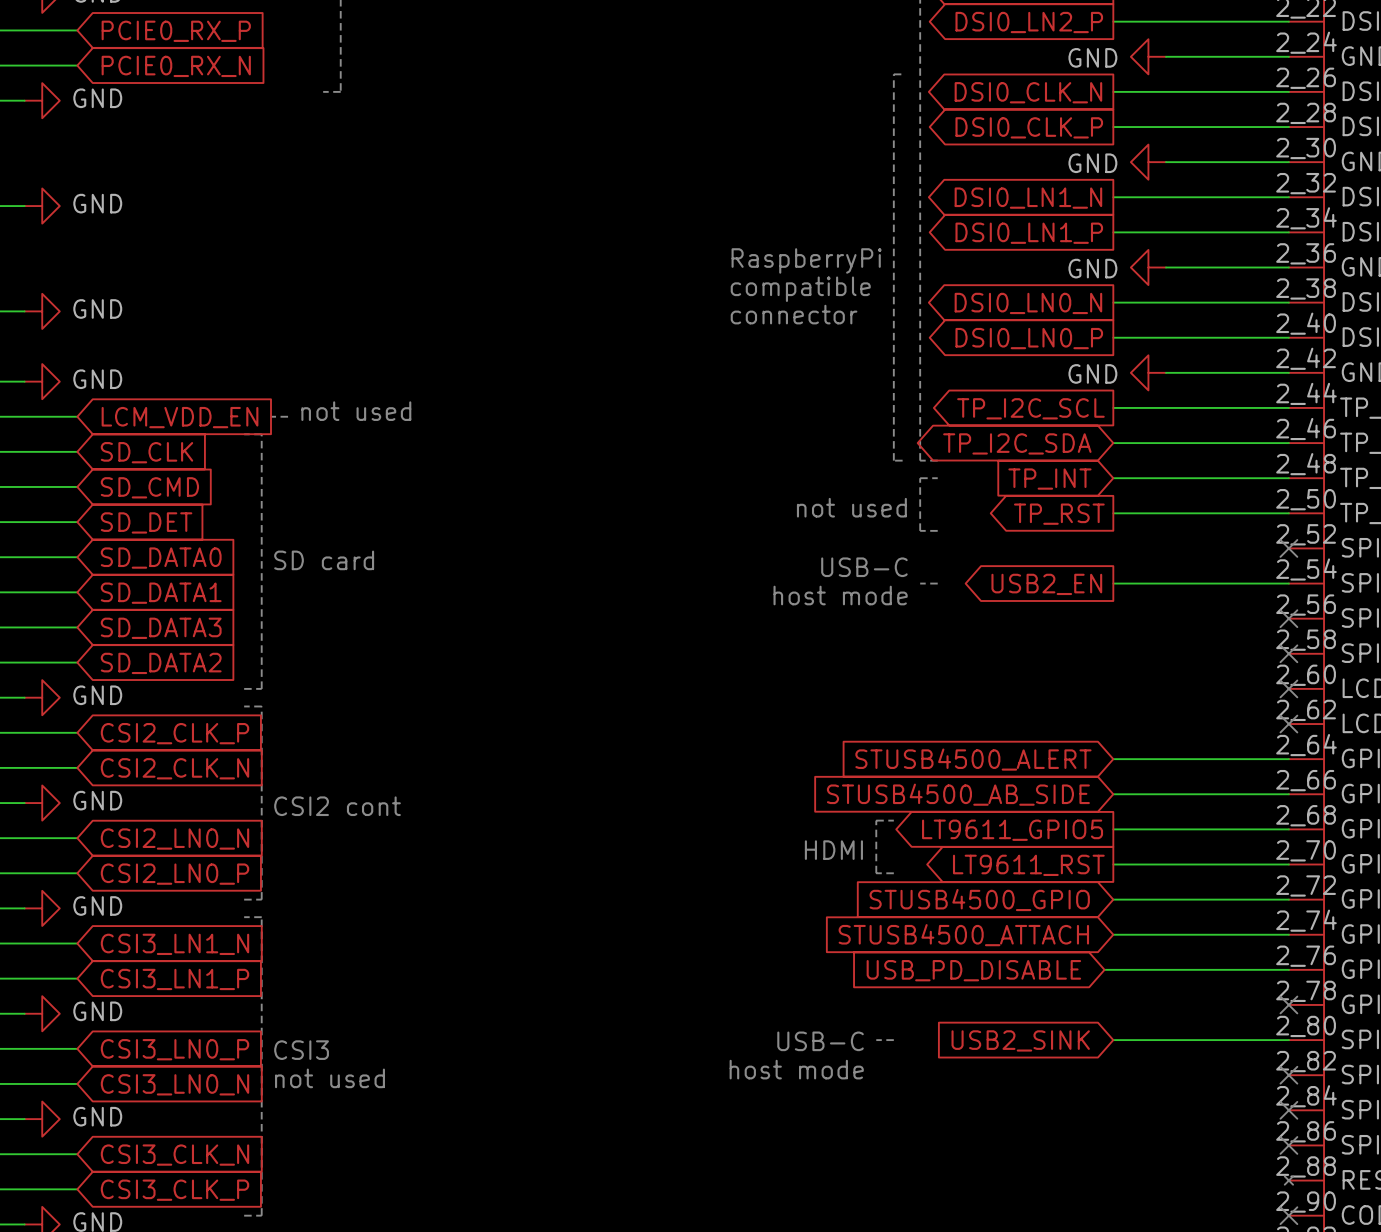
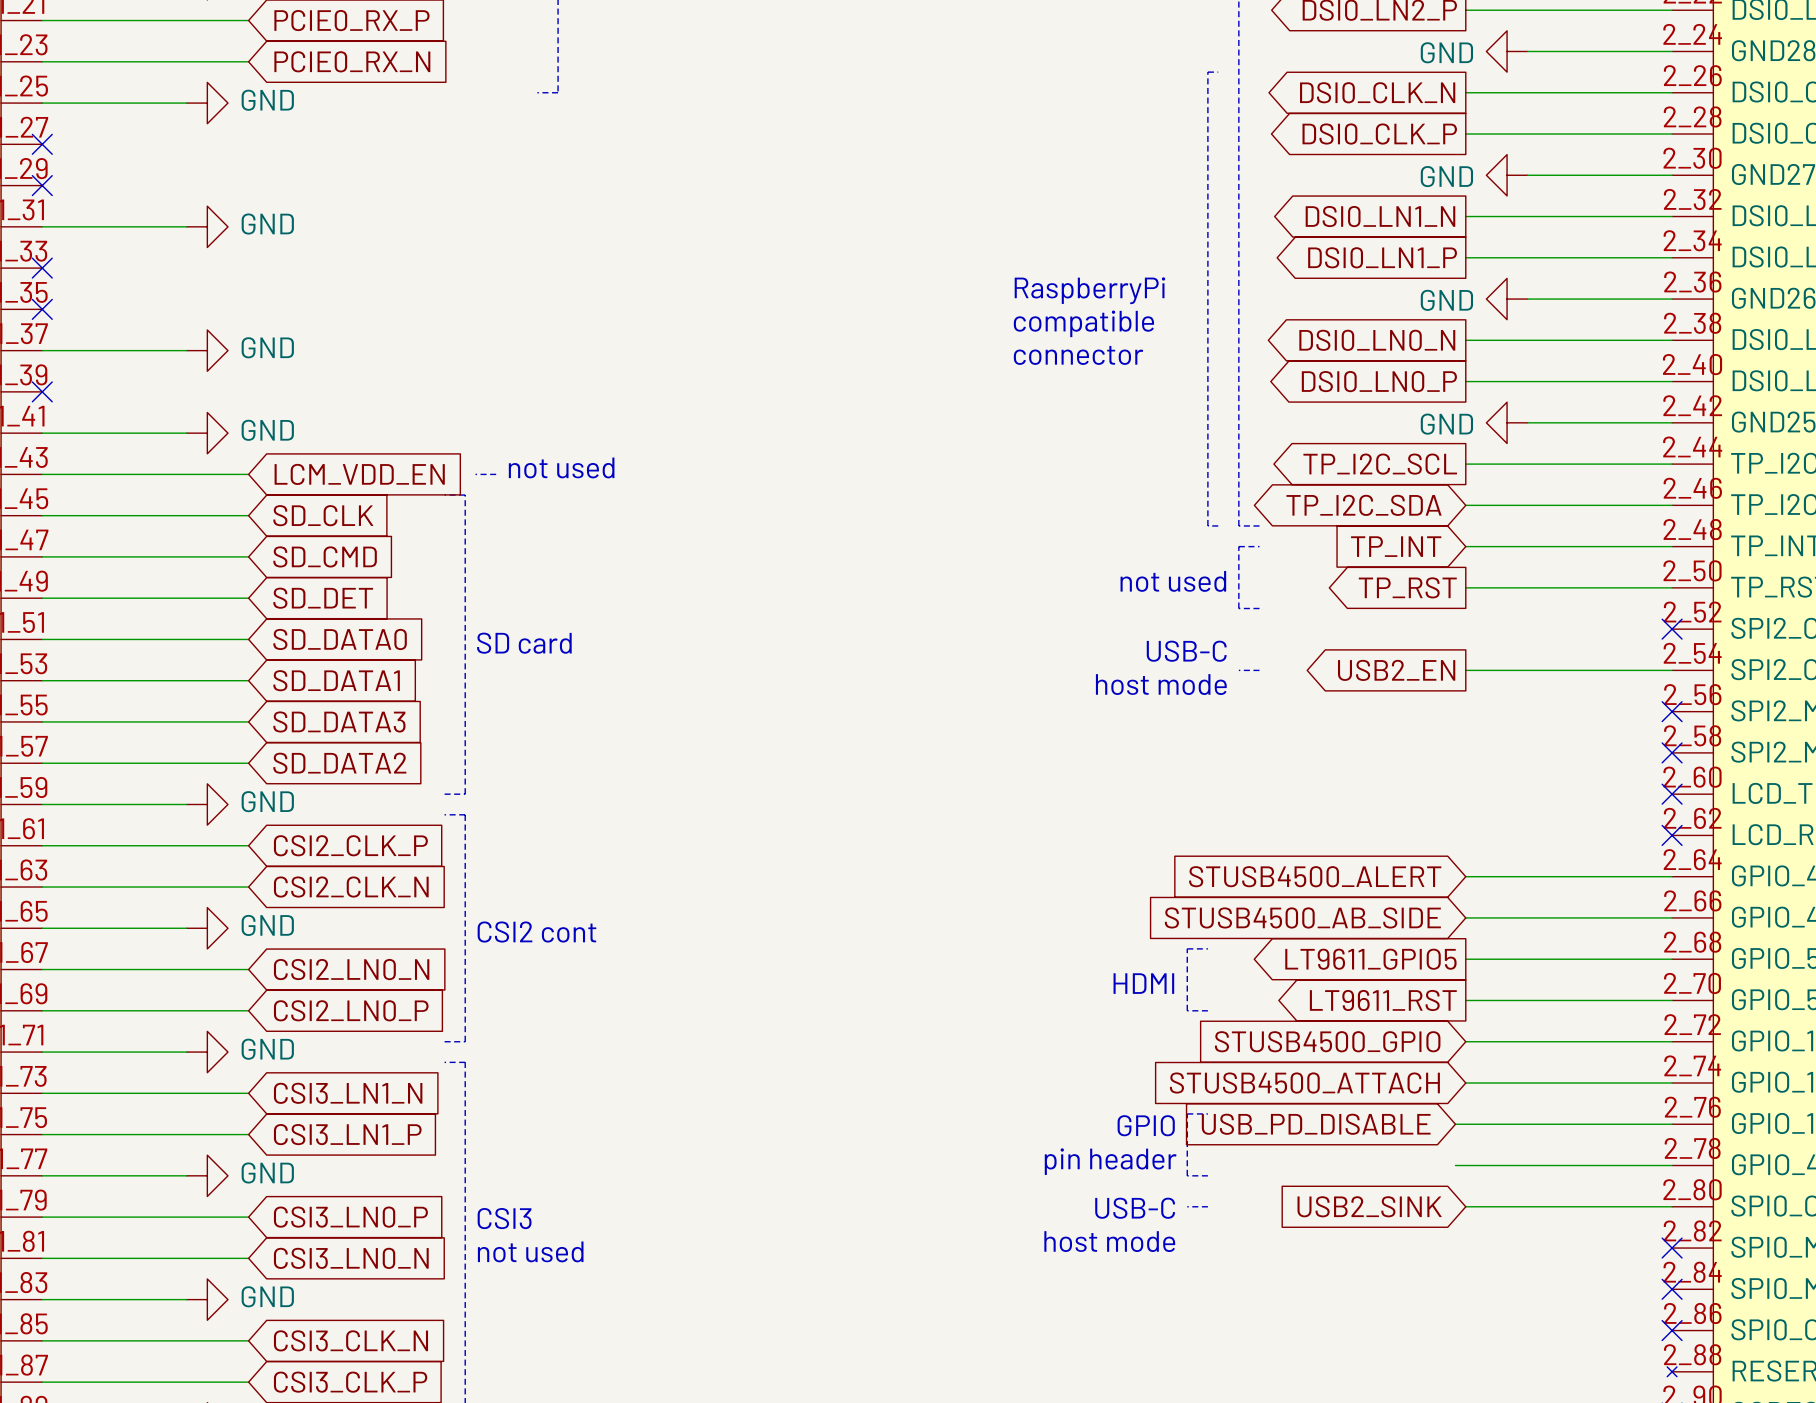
line: none -> (1207, 1113) (1187, 1113) (1187, 1175) (1207, 1175)
text: none -> GPIO (1146, 1125)
text: none -> pin header (1110, 1161)
wire: none -> (1455, 1165) (1672, 1165)
no-connect mark: (1288, 1004) -> none

